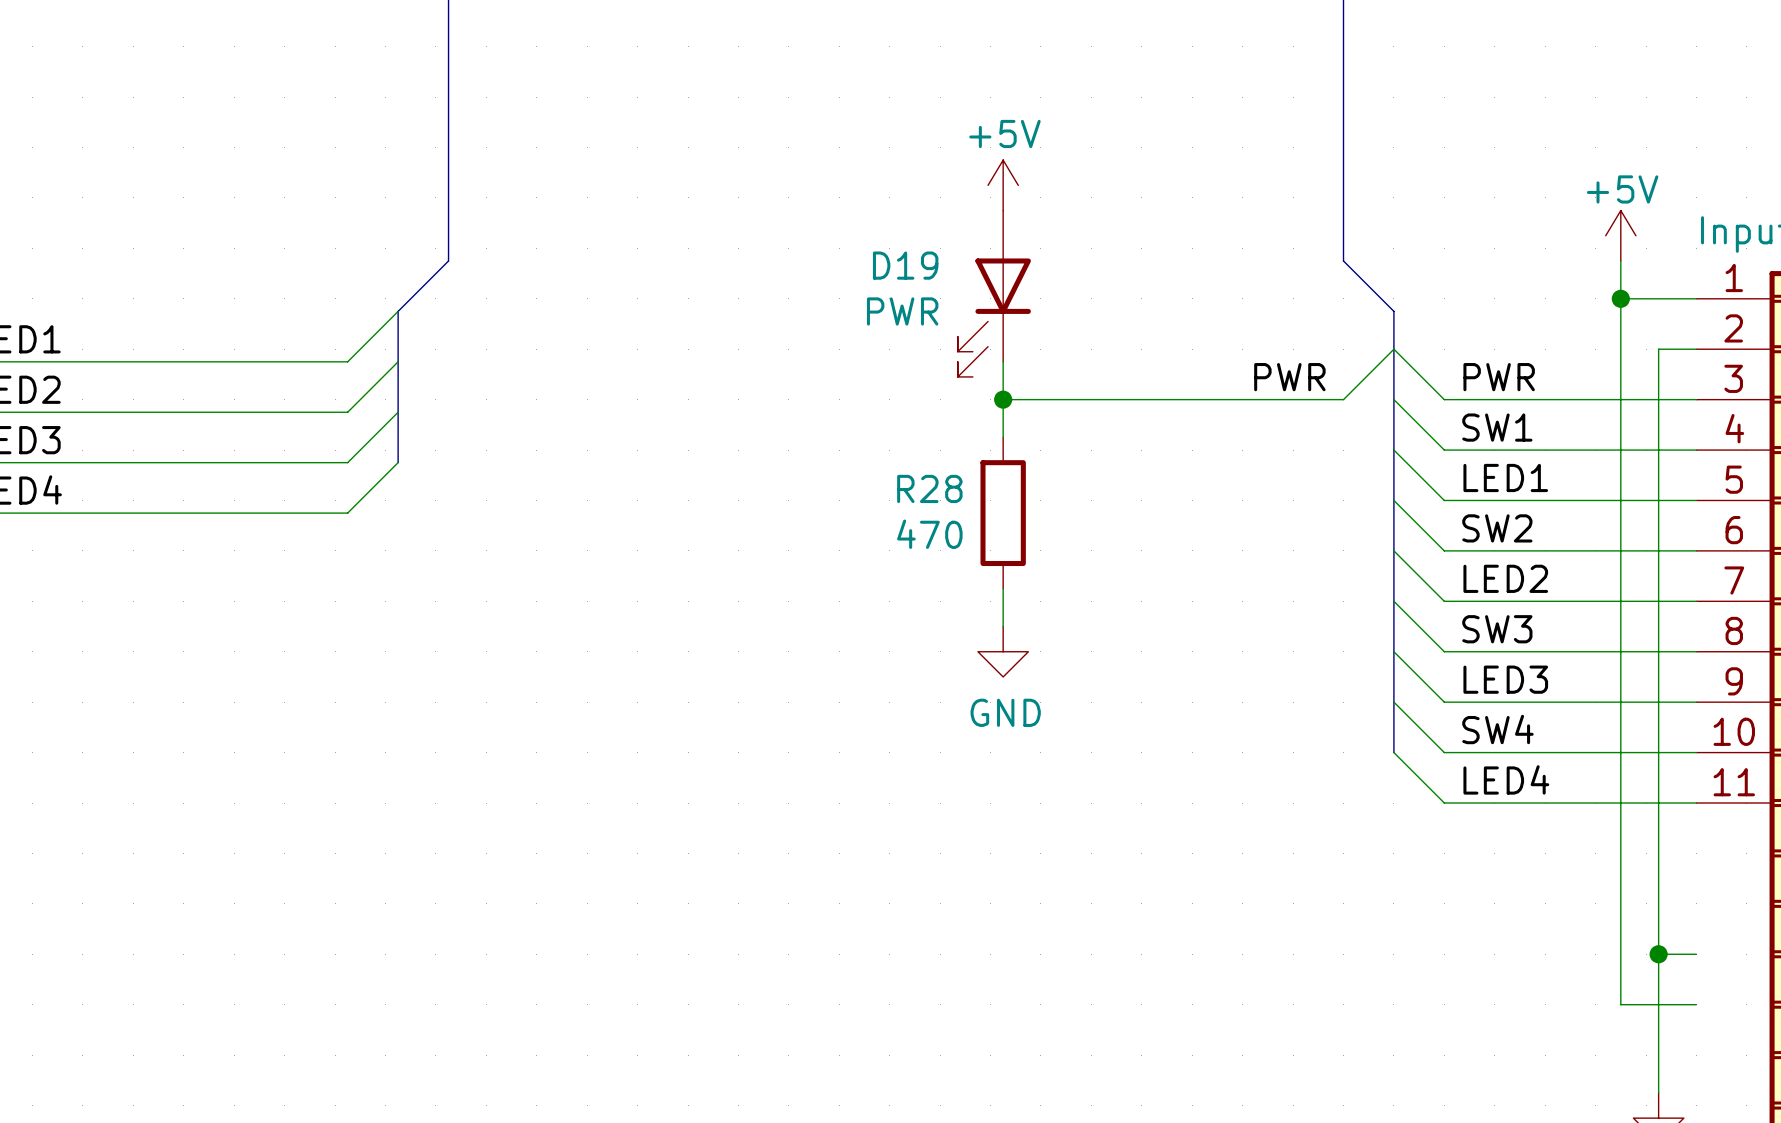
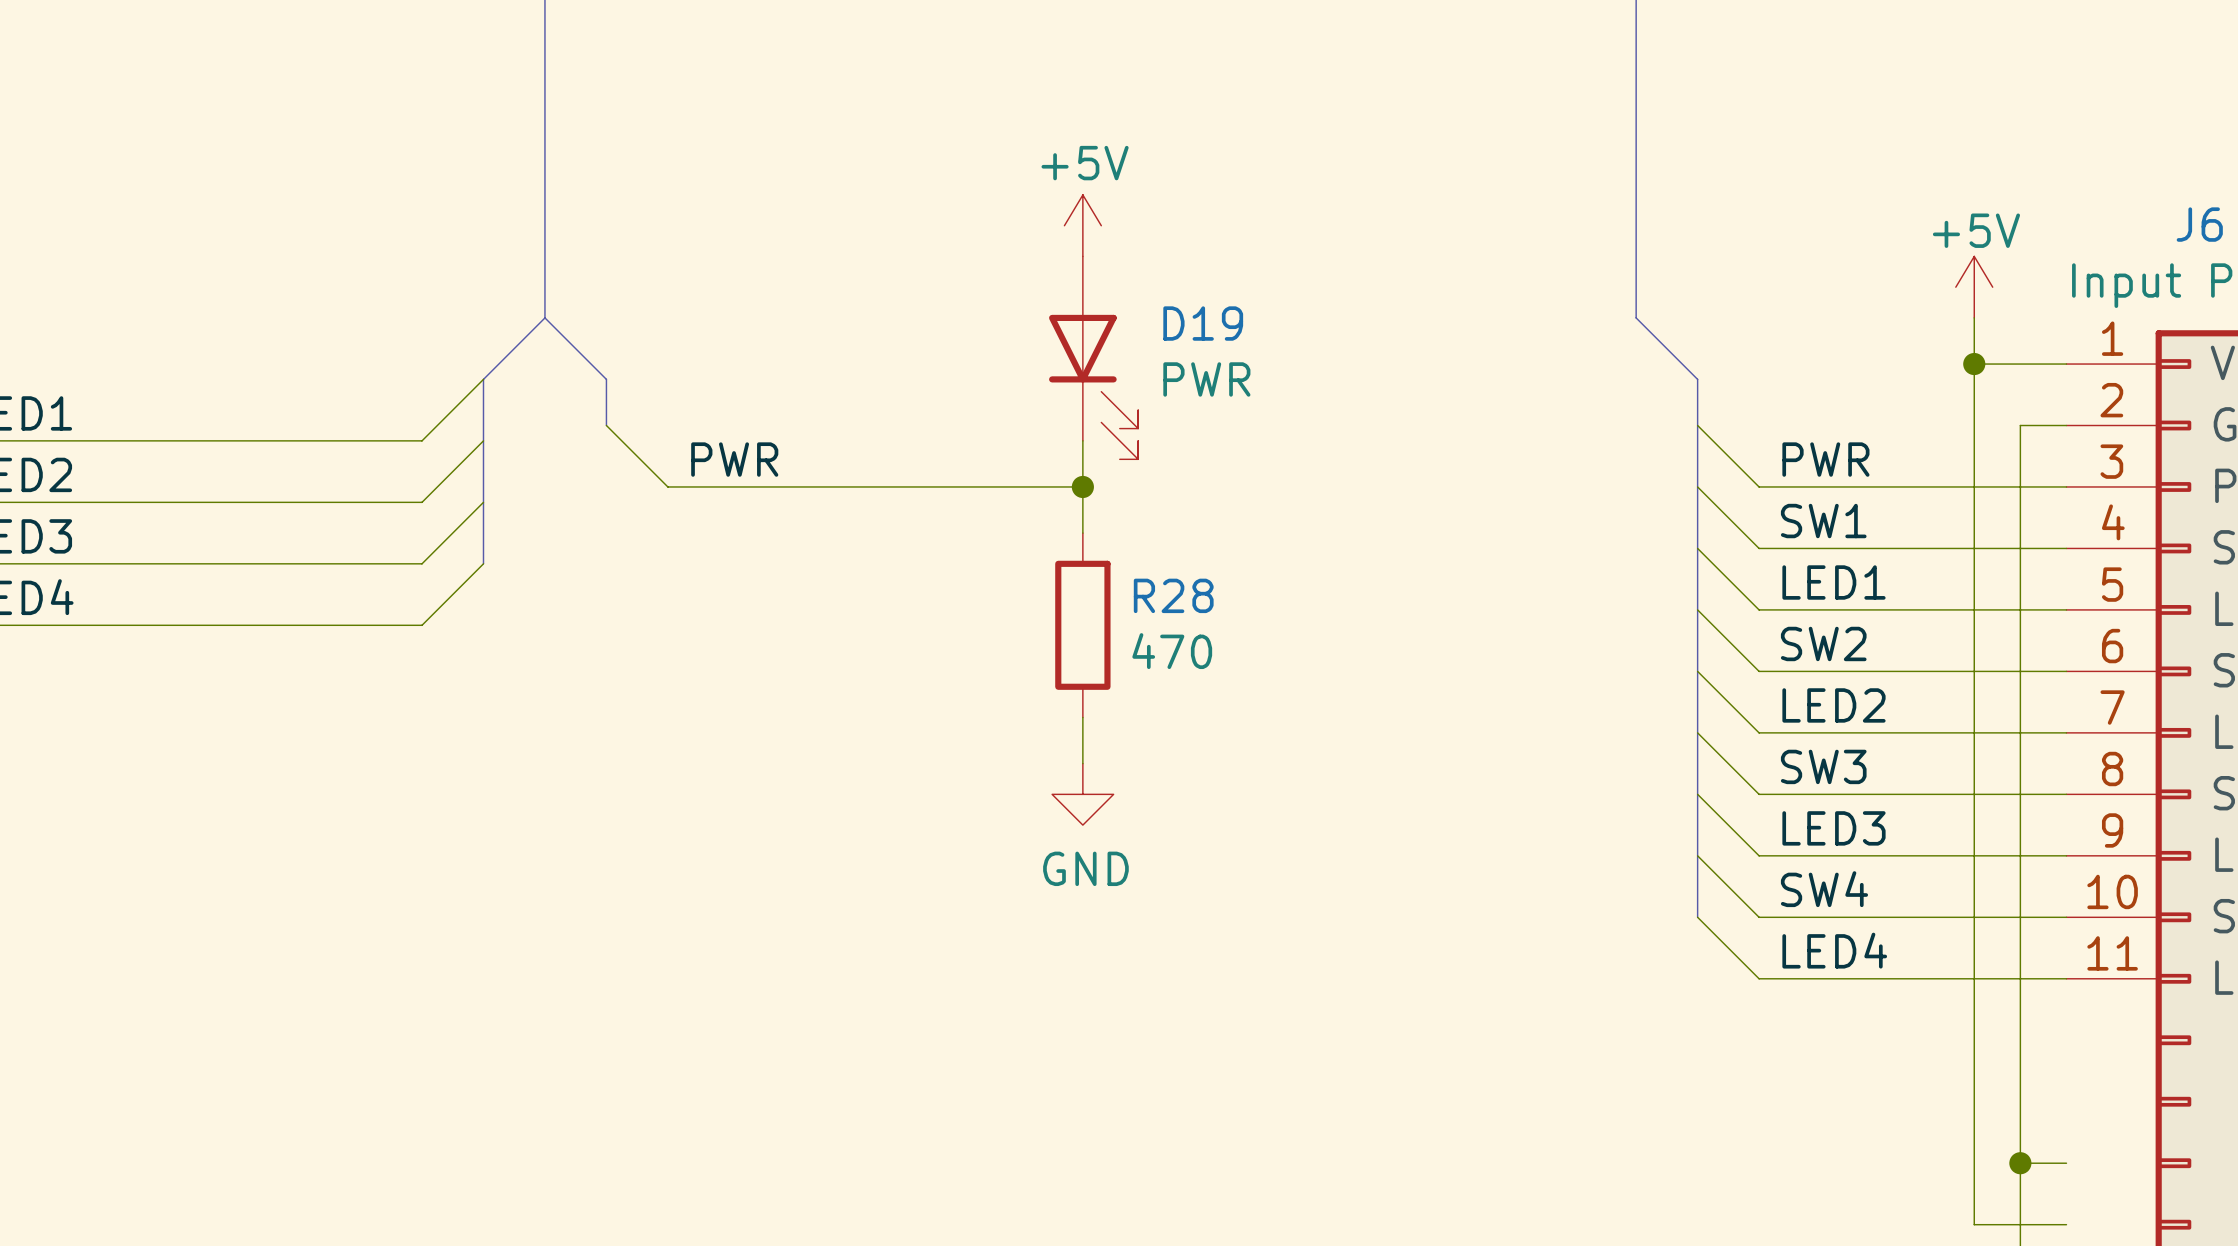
power symbol position: +5V (1003, 185) -> +5V (1082, 225)
bus: none -> (544, 317) (606, 379) (606, 425)
D19 flip: as is (994, 317) -> left-right (1093, 387)
wire: none -> (606, 425) (667, 486) (1082, 486)
wire: (1393, 349) (1343, 399) (1003, 399) -> none
wire: (1003, 361) (1003, 437) -> (1082, 440) (1082, 533)
label: none -> PWR (734, 459)
label: PWR (1289, 377) -> none
junction position: (1003, 399) -> (1082, 486)
R28 name position: R28 (929, 488) -> R28 (1173, 595)
R28 position: (1003, 513) -> (1082, 625)
R28 value position: 470 (929, 534) -> 470 (1172, 651)
wire: (1003, 588) (1003, 626) -> (1082, 717) (1082, 763)
power symbol position: GND (1003, 651) -> GND (1082, 794)

